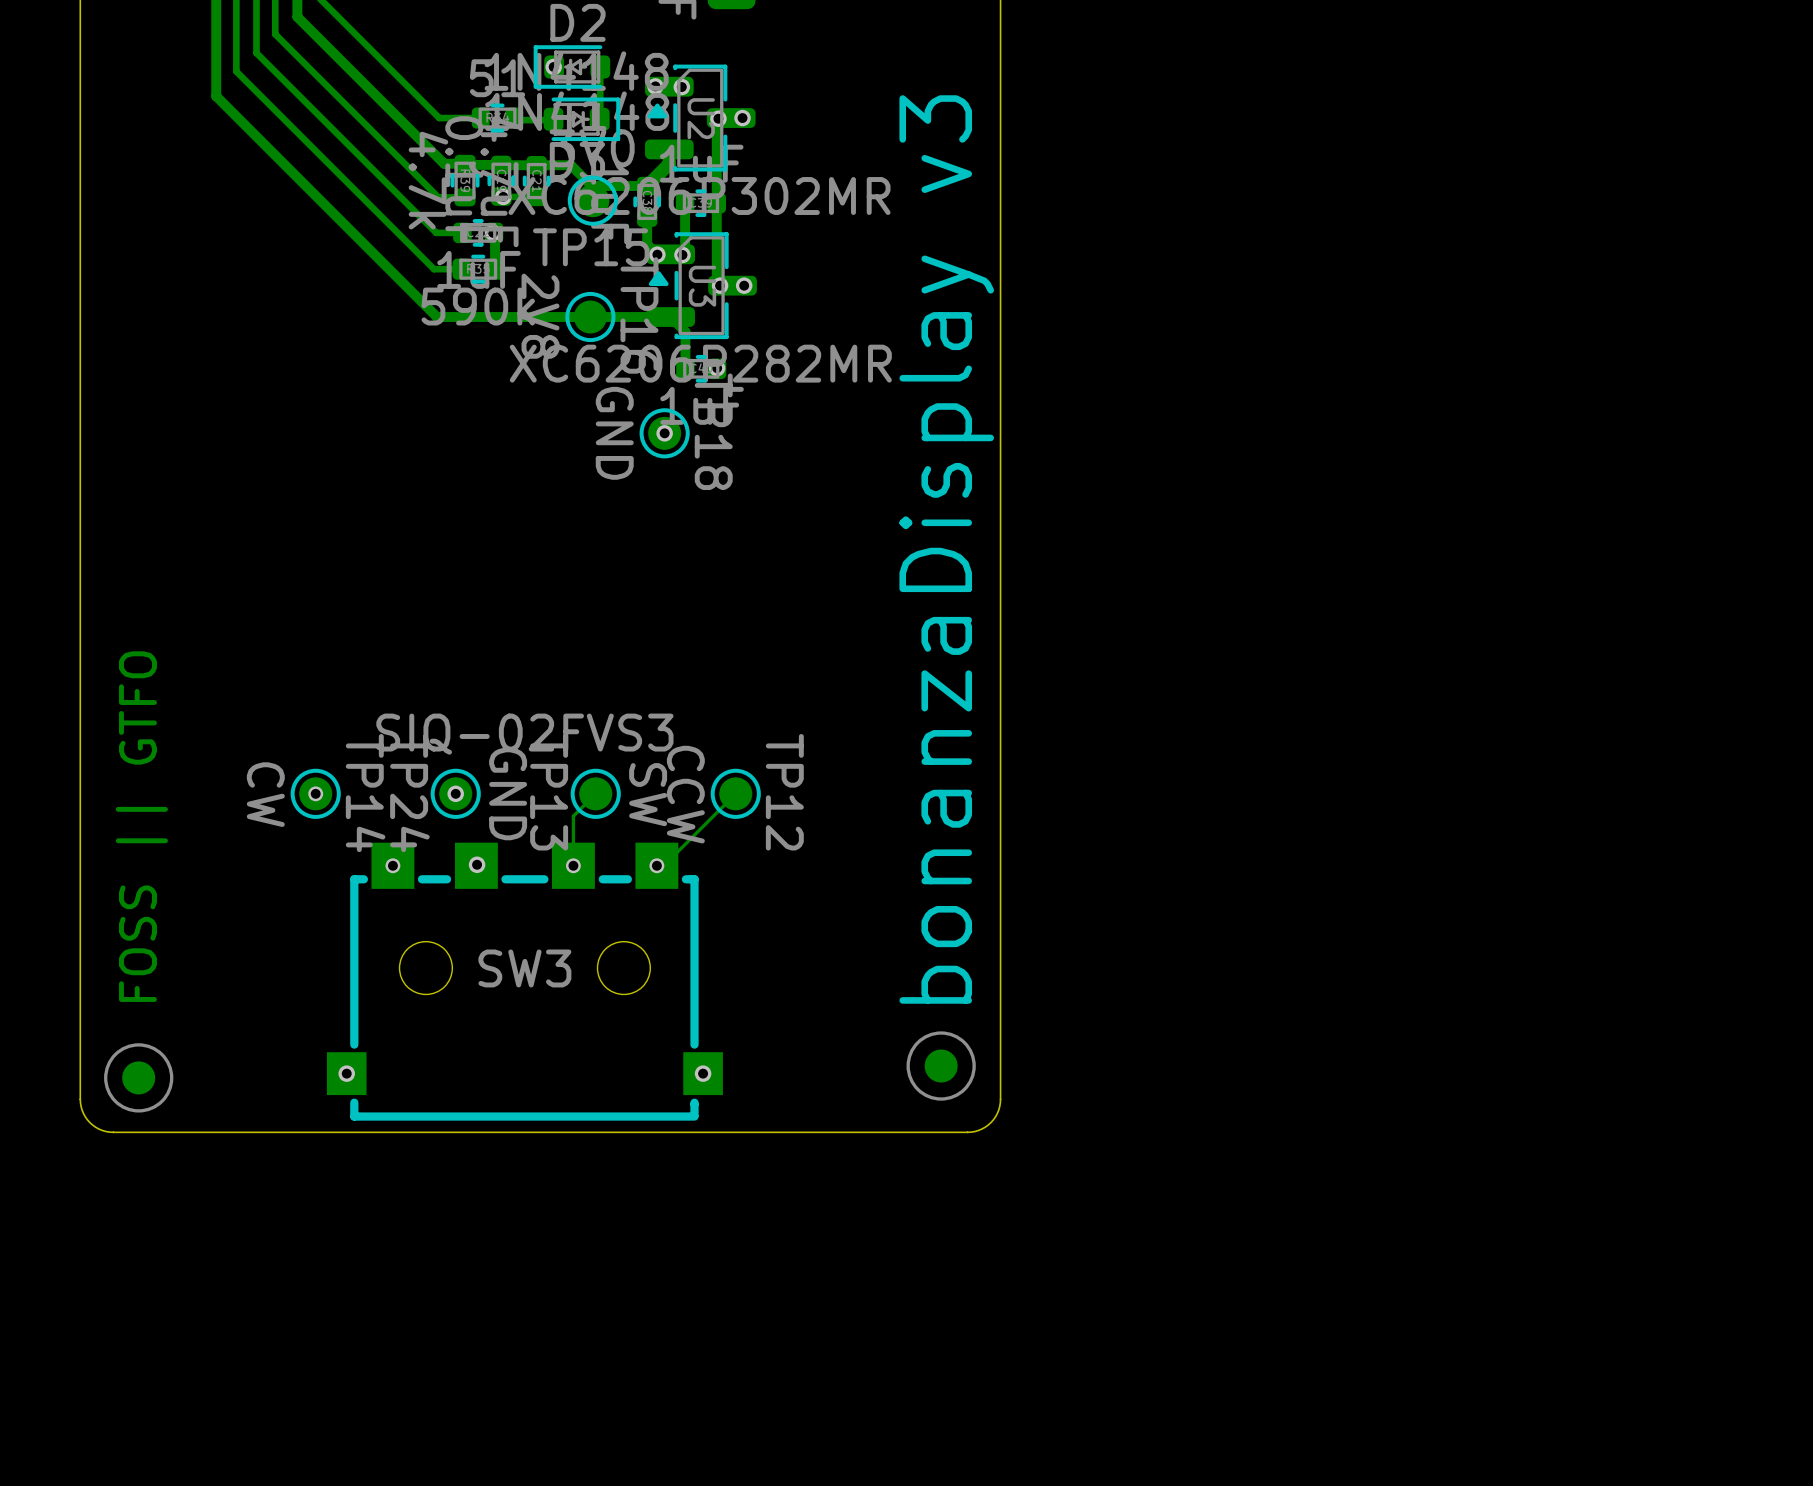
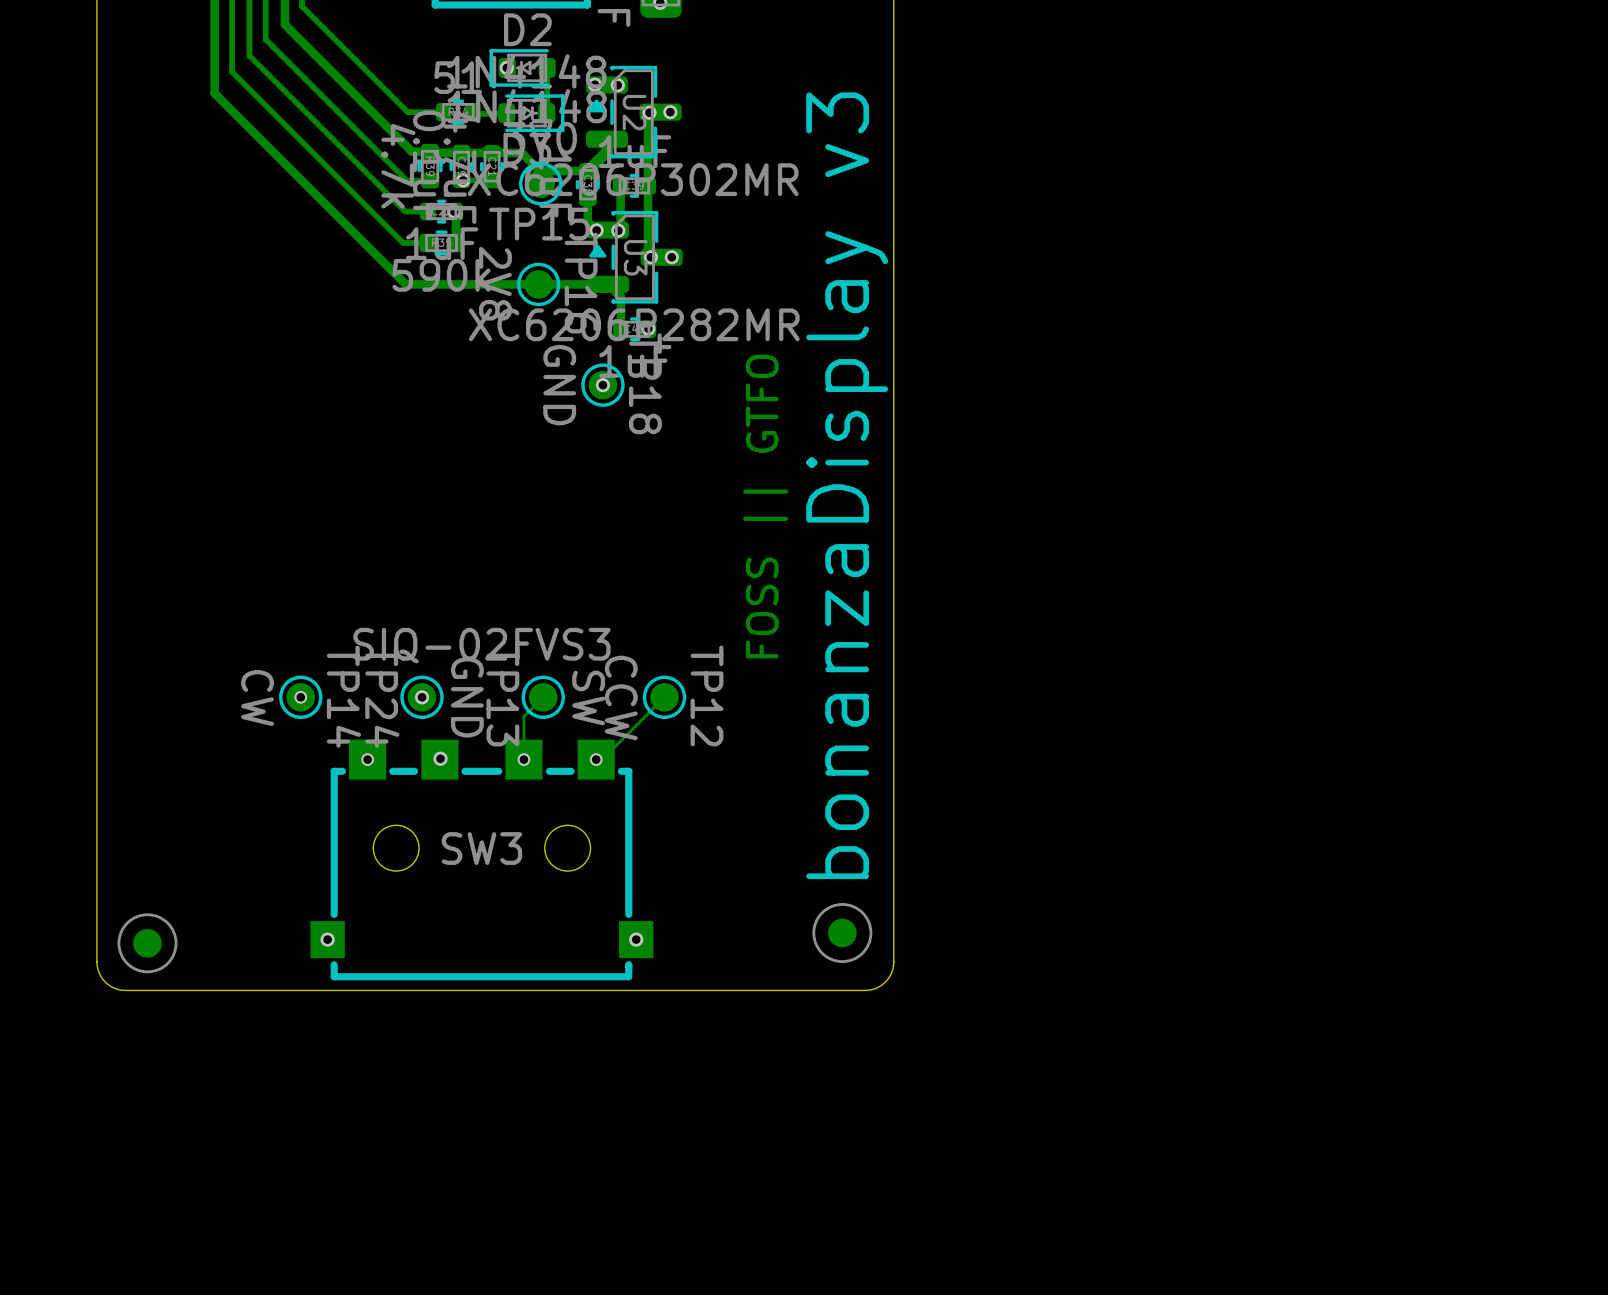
text position: FOSS || GTFO (141, 826) -> FOSS || GTFO (765, 506)

